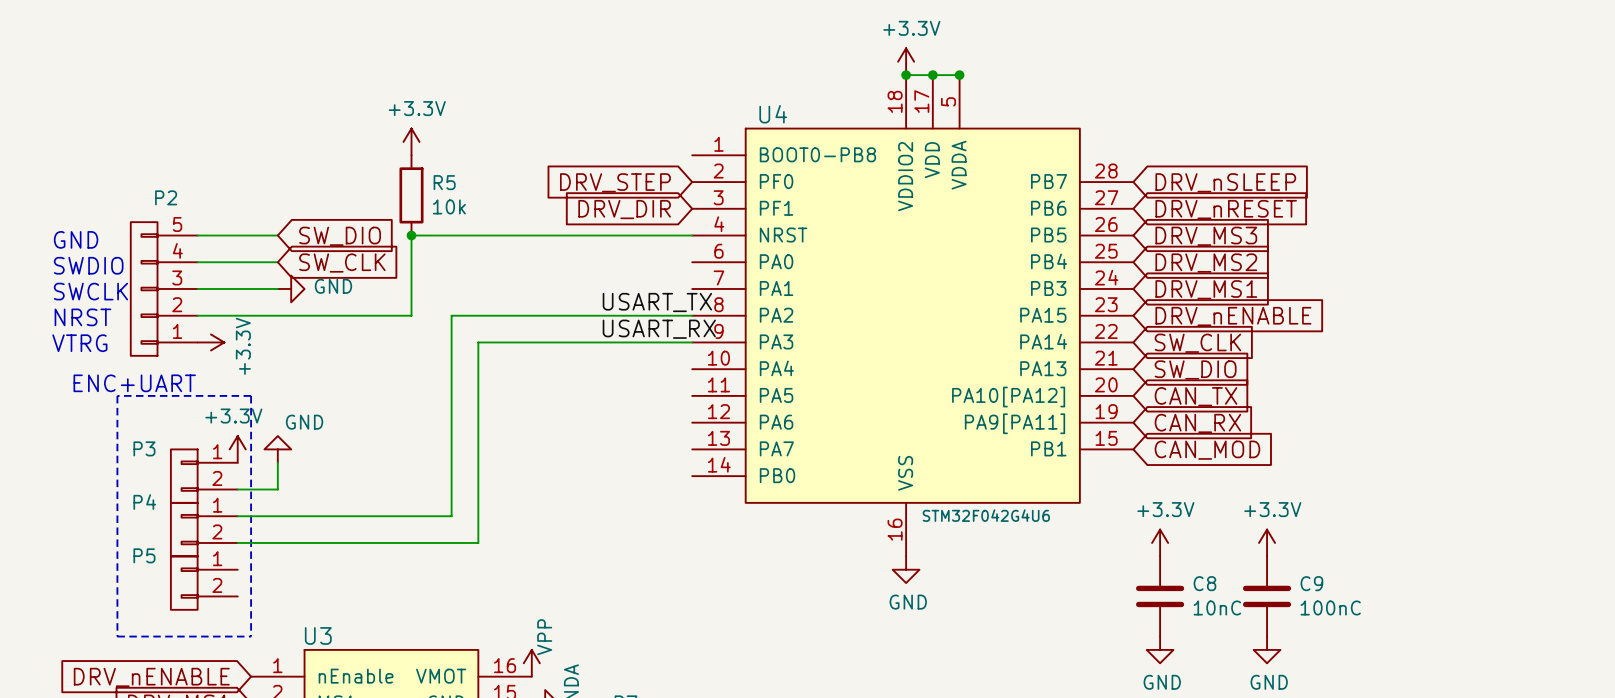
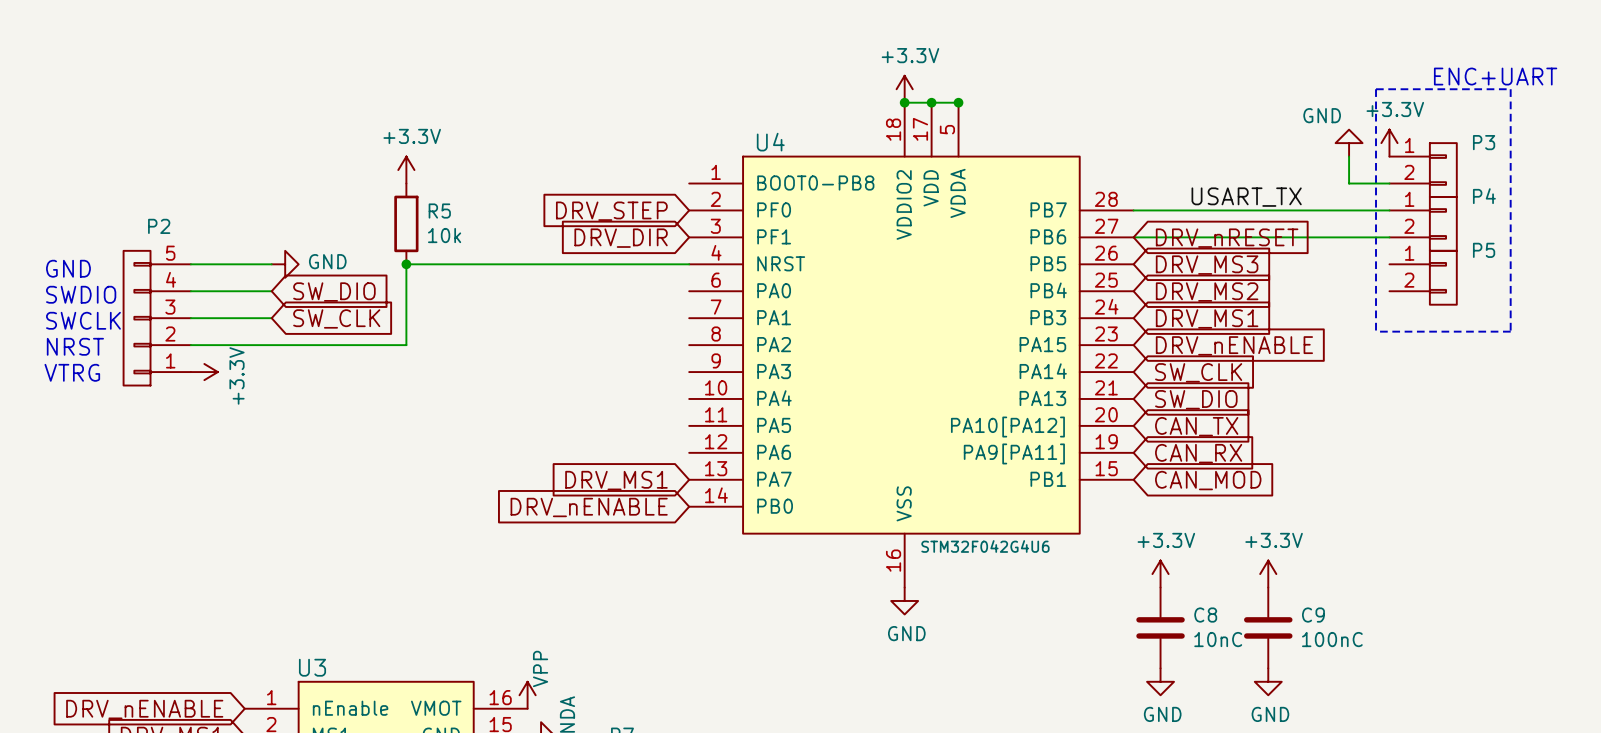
text: none -> ENC+UART (1495, 76)
line: none -> (1376, 89) (1376, 331) (1510, 331) (1510, 89) (1376, 89)
power symbol: none -> GND (1349, 143)
power symbol: none -> +3.3V (1389, 143)
wire: none -> (1349, 156) (1349, 183) (1389, 183)
label: none -> USART_TX (1246, 197)
wire: none -> (1133, 210) (1389, 210)
global label: DRV_nSLEEP (1225, 182) -> none
wire: none -> (1133, 237) (1389, 237)
global label: SW_DIO (340, 236) -> none
global label: SW_CLK (342, 263) -> SW_DIO (334, 292)
power symbol position: GND (291, 288) -> GND (285, 264)
global label: none -> SW_CLK (336, 318)
label: USART_TX (657, 302) -> none
wire: (692, 315) (451, 315) (451, 516) (237, 516) -> none
label: USART_RX (659, 329) -> none
wire: (692, 342) (478, 342) (478, 542) (237, 542) -> none
text: ENC+UART (134, 383) -> none
line: (117, 395) (251, 395) (251, 636) (117, 636) (117, 395) -> none
power symbol: +3.3V (237, 449) -> none
power symbol: GND (277, 449) -> none
global label: none -> DRV_MS1 (616, 480)
wire: (277, 462) (277, 489) (237, 489) -> none
P3 flip: as is (184, 476) -> left-right (1443, 170)
P3 position: (204, 476) -> (1423, 170)
global label: none -> DRV_nENABLE (589, 507)
P4 flip: as is (184, 529) -> left-right (1443, 223)
P4 position: (204, 529) -> (1423, 223)
P5 flip: as is (184, 583) -> left-right (1443, 277)
P5 position: (204, 583) -> (1423, 277)

